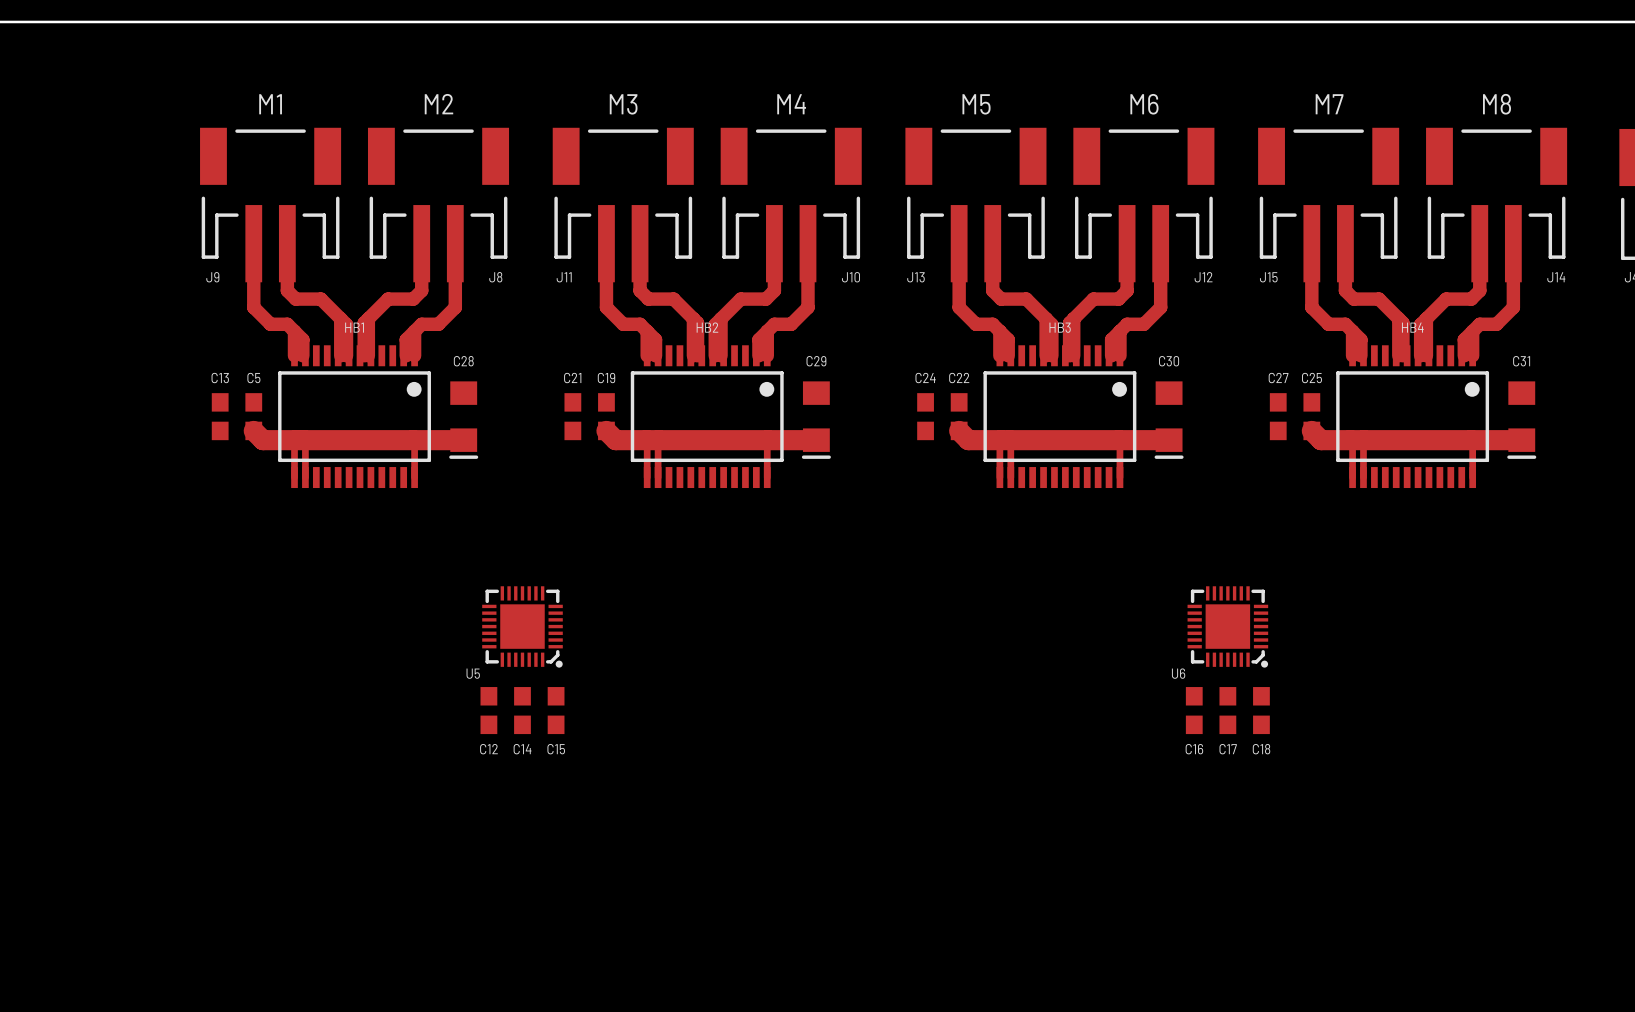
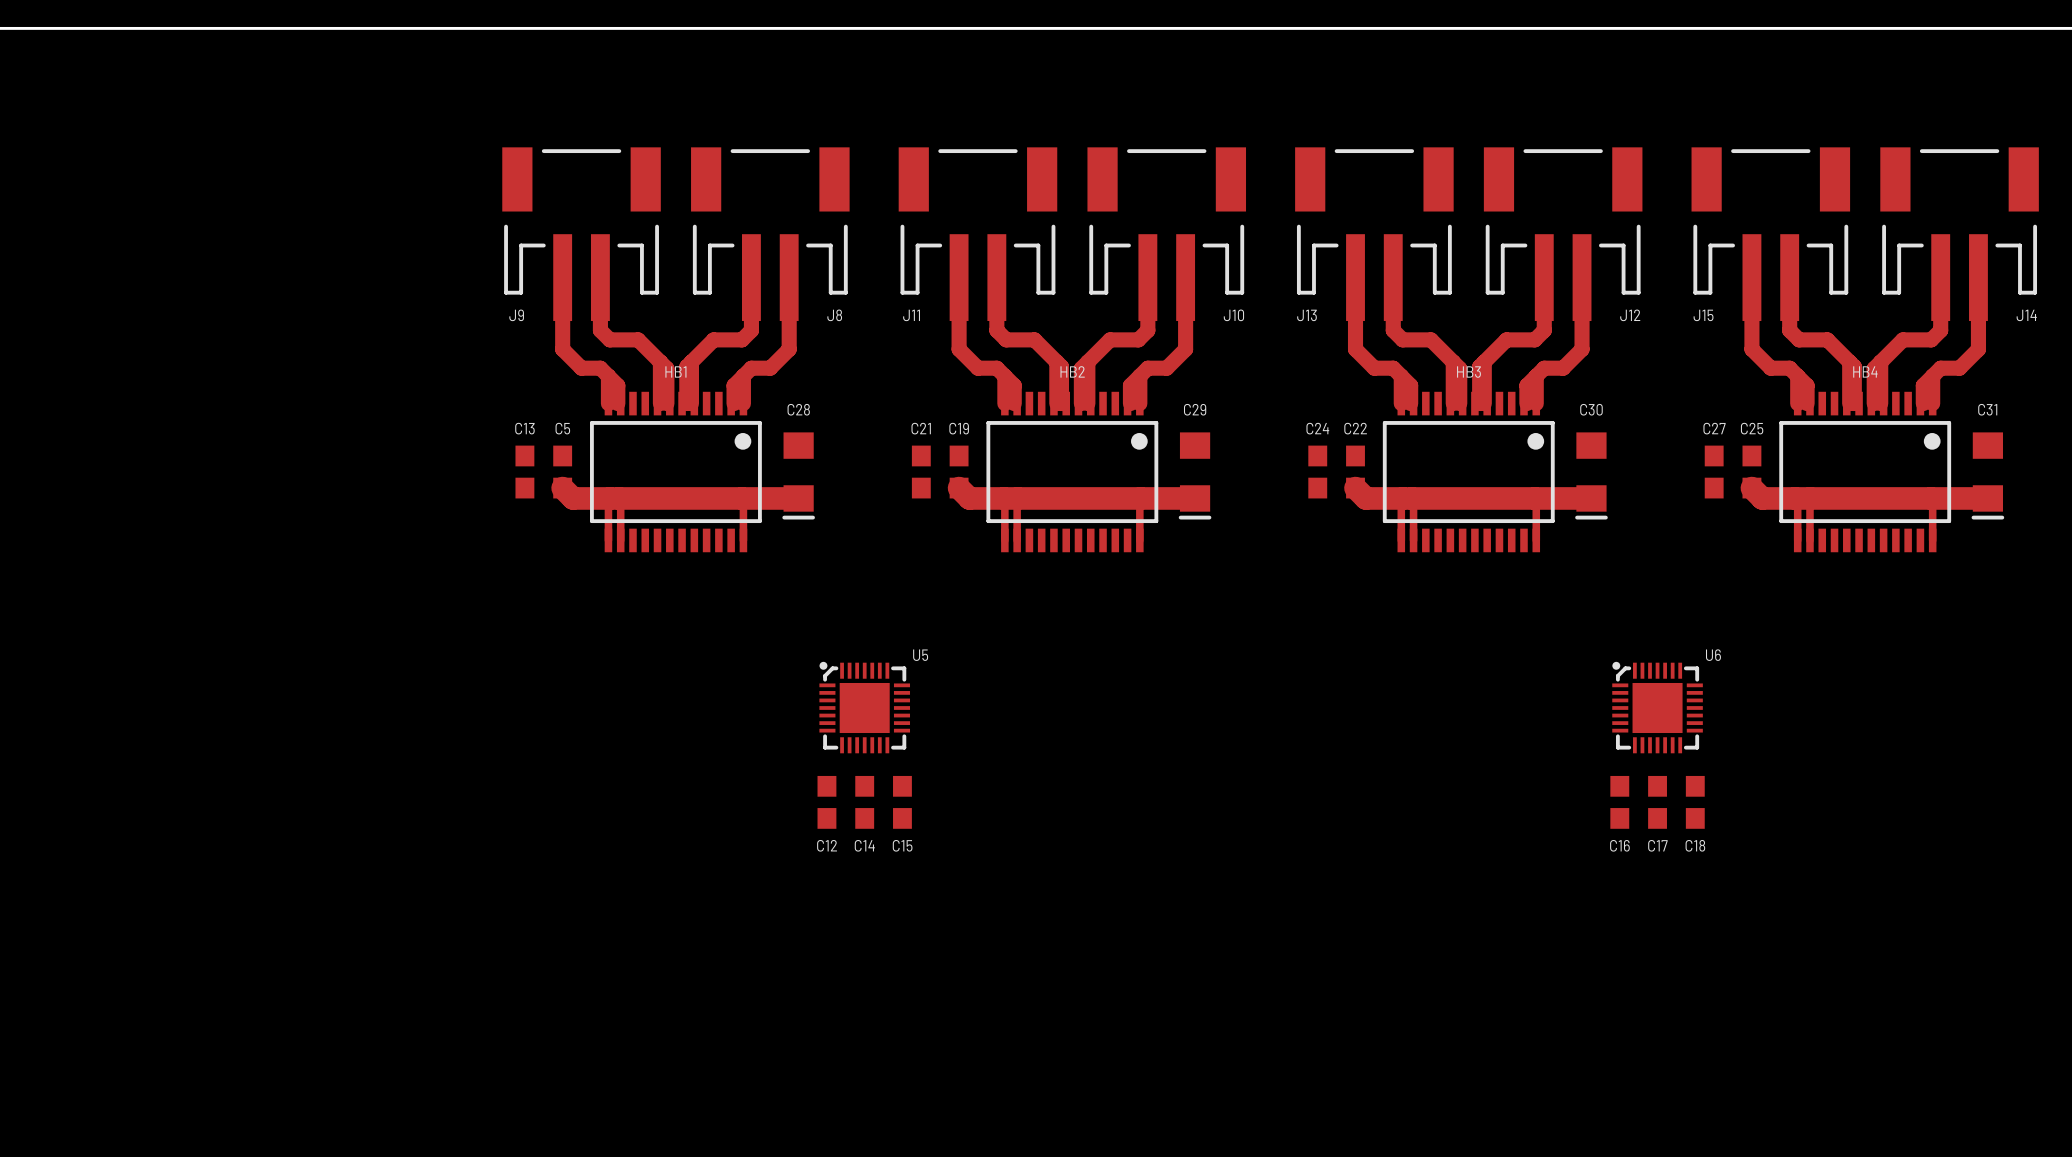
text: M1 (270, 104) -> none
text: M2 (438, 104) -> none
text: M3 (623, 104) -> none
text: M4 (791, 104) -> none
text: M5 (976, 104) -> none
text: M6 (1144, 104) -> none
text: M7 (1329, 104) -> none
text: M8 (1497, 104) -> none
U5 rotation: 0° (522, 626) -> 180° (864, 707)
U6 rotation: 0° (1227, 626) -> 180° (1657, 707)

